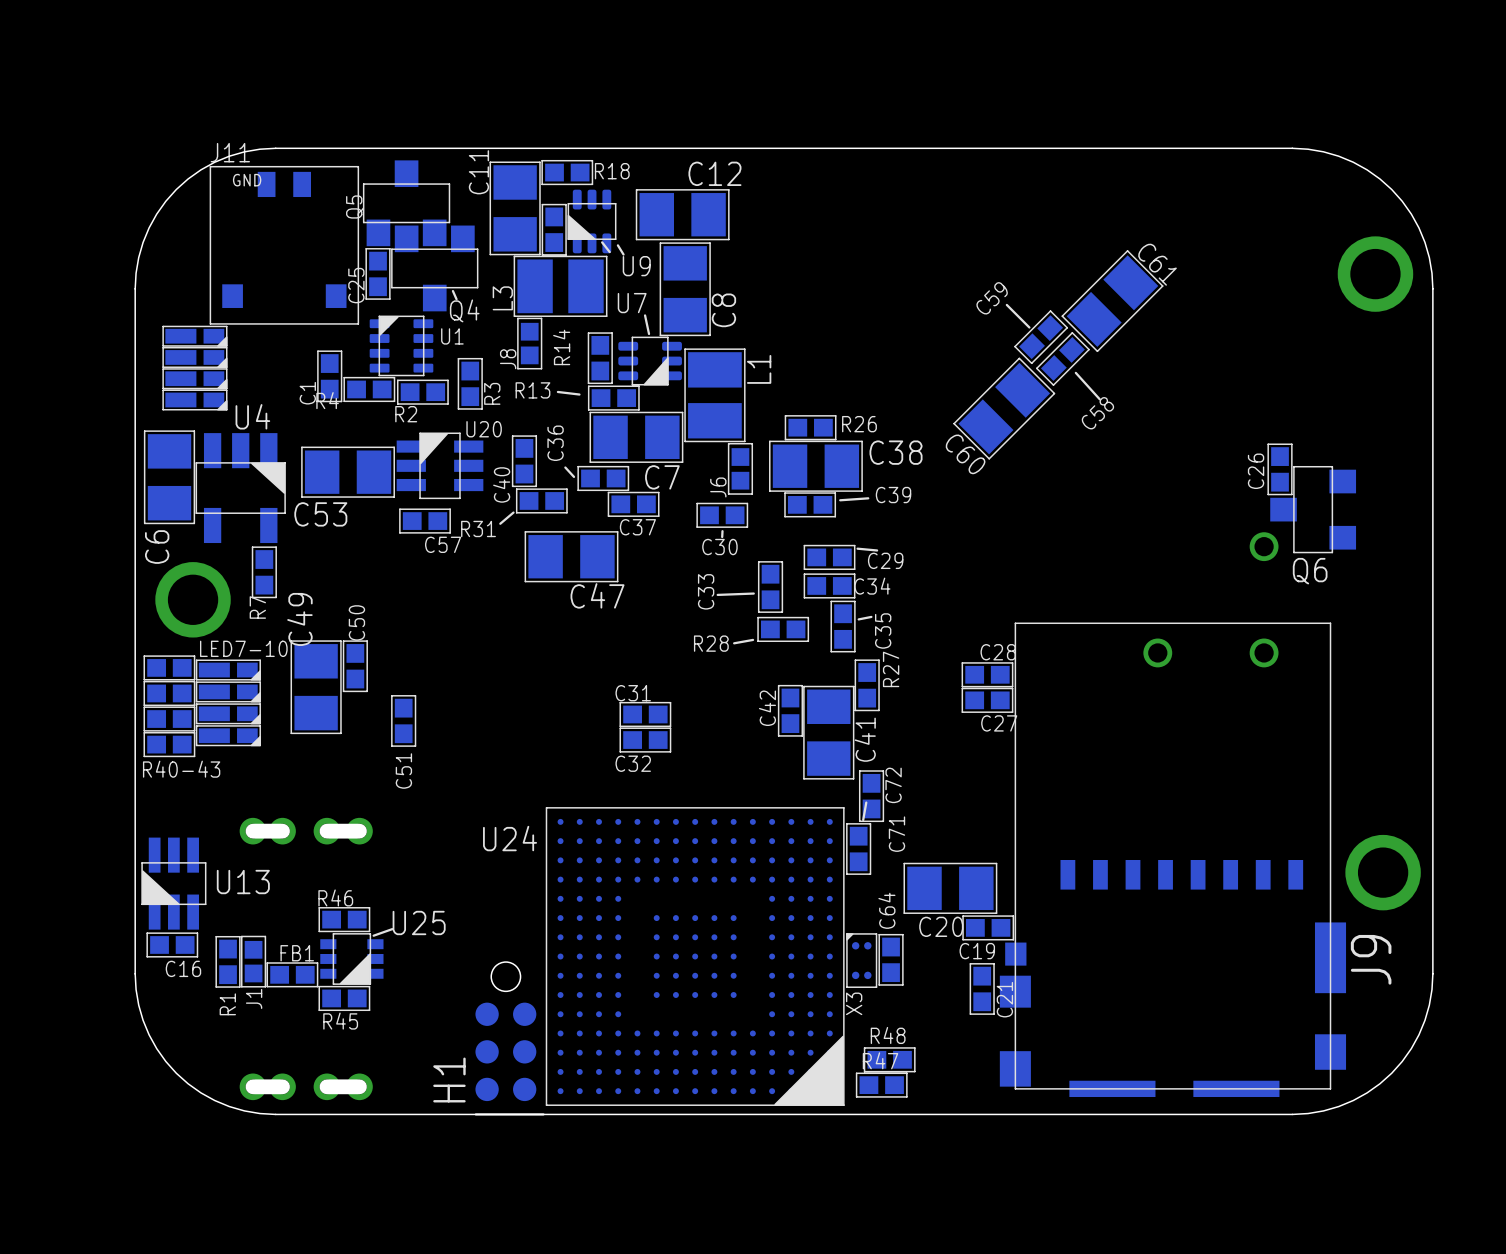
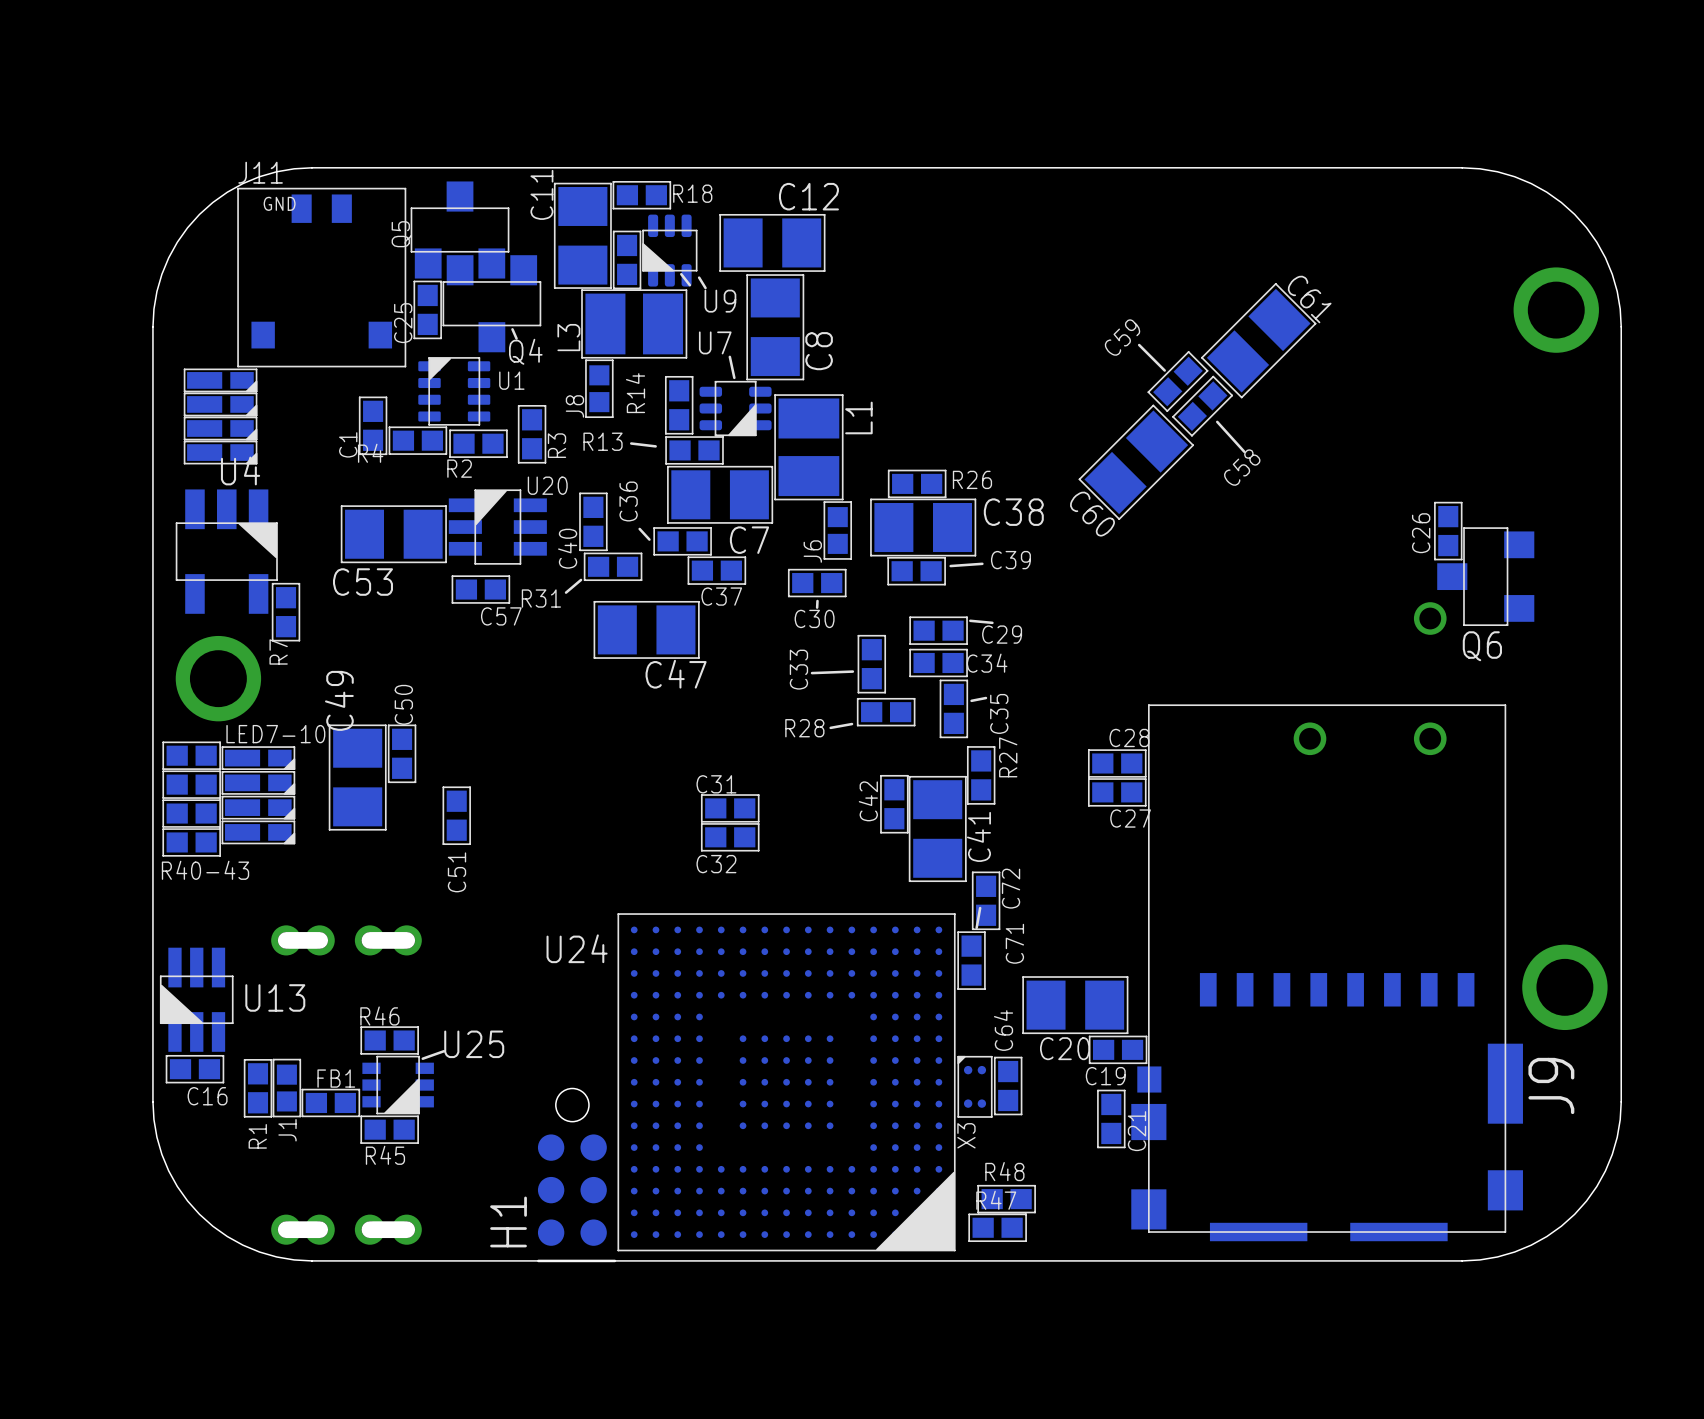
C6: (169, 477) -> none
U4 position: (240, 488) -> (226, 551)
R7 position: (264, 572) -> (286, 612)

